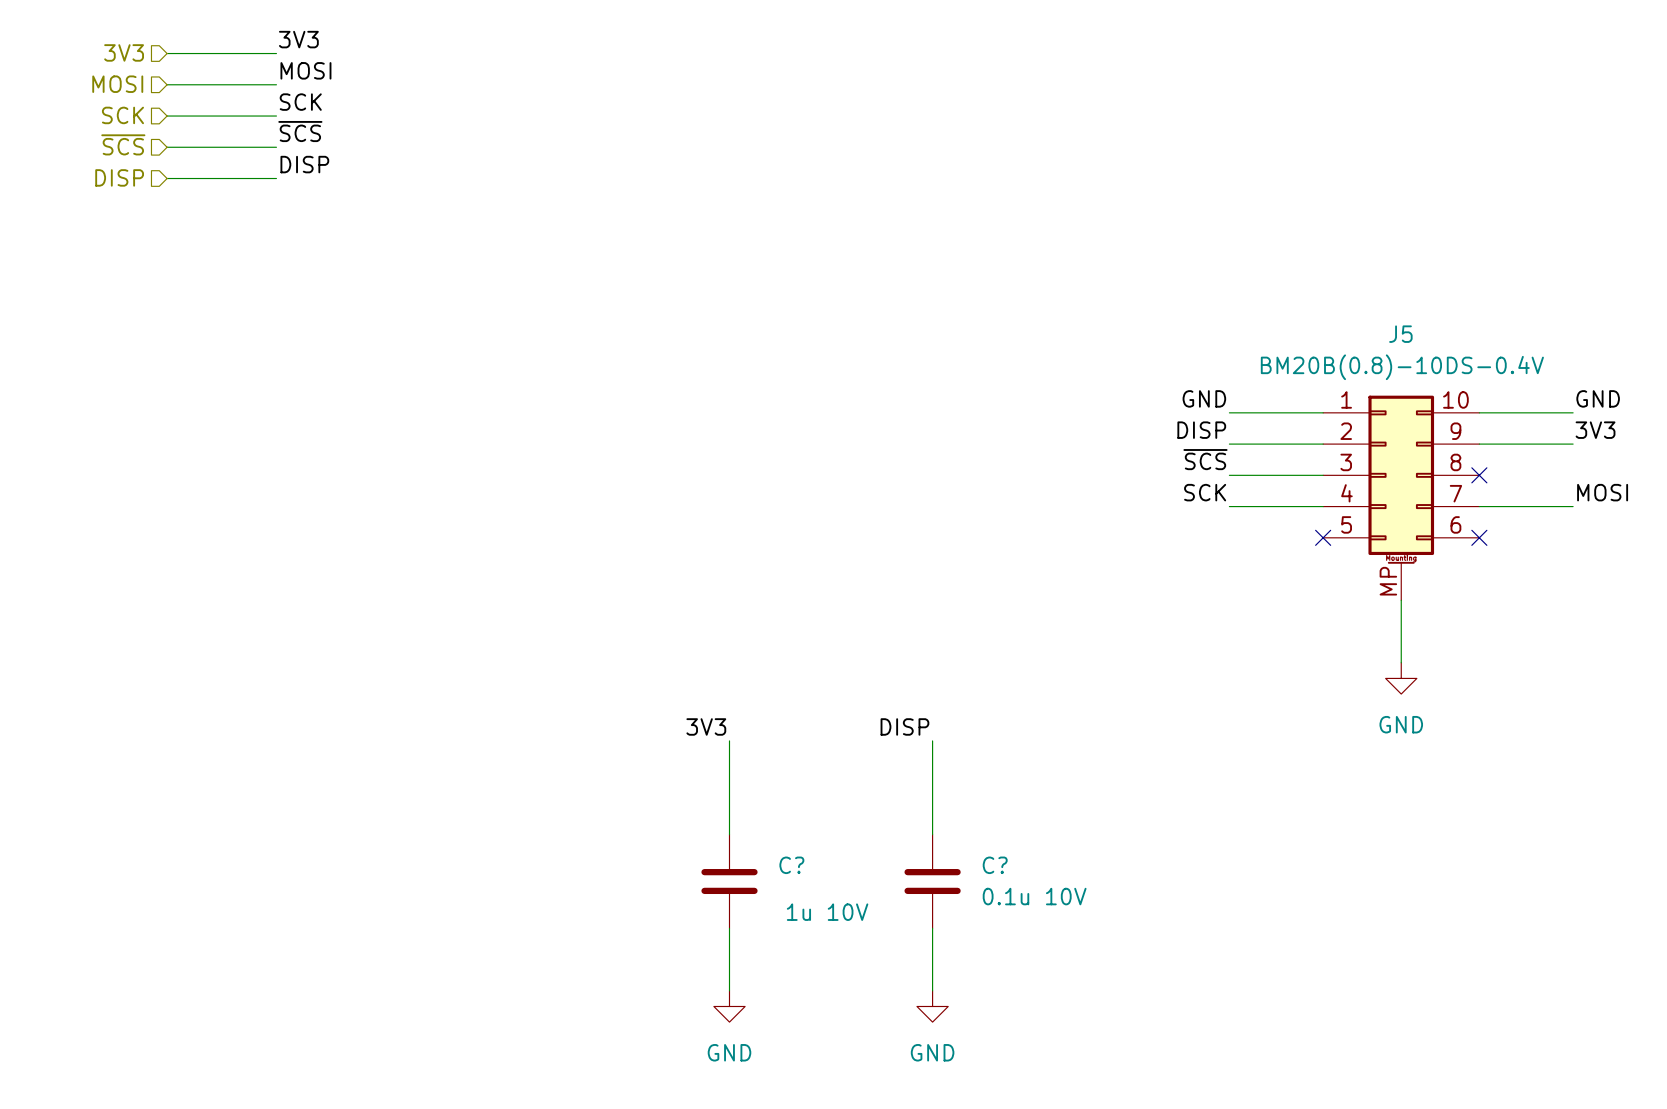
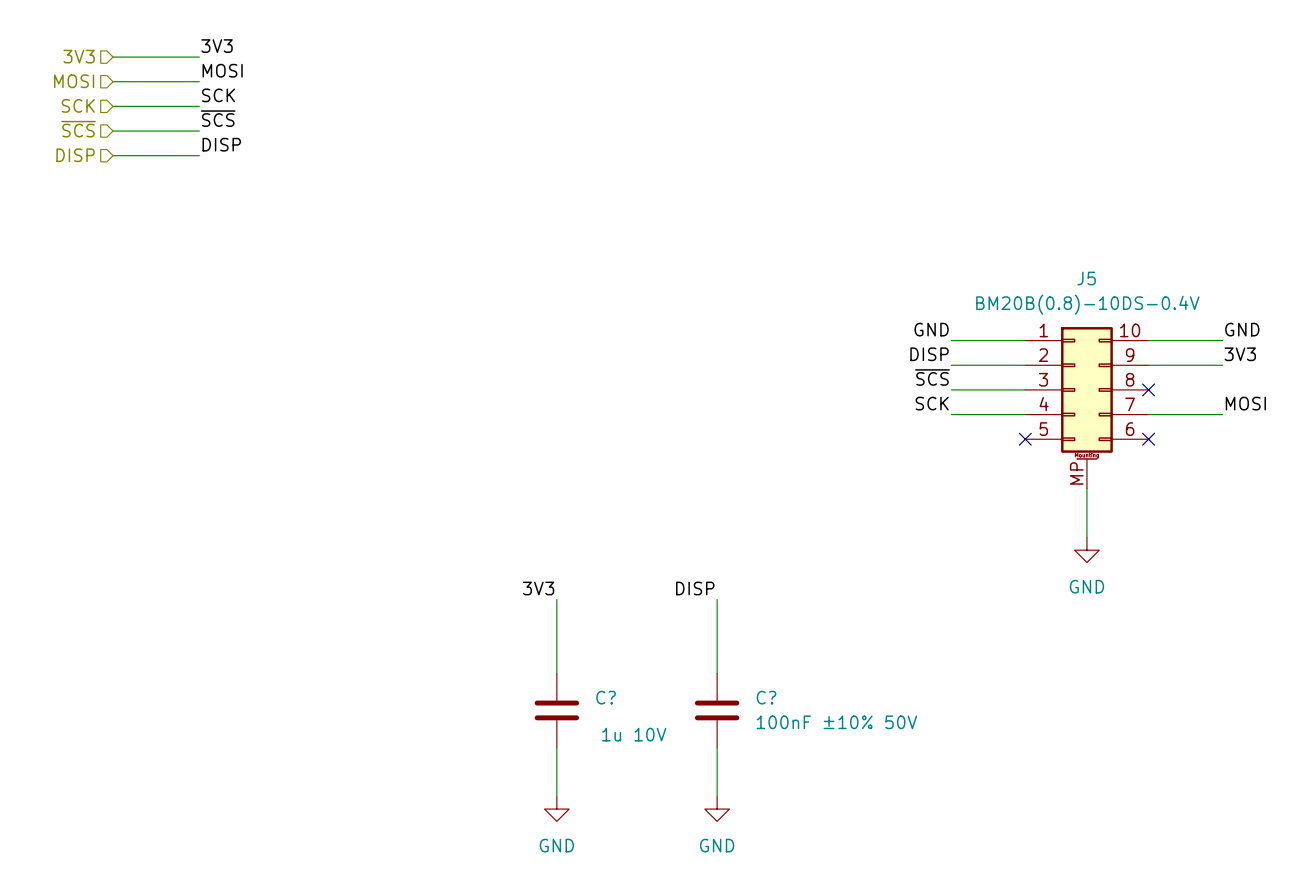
C? value: 0.1u 10V (1034, 896) -> 100nF ±10% 50V (836, 722)

